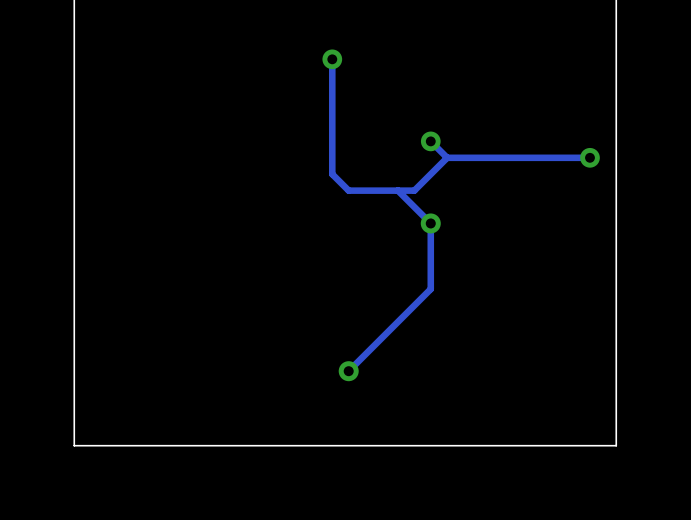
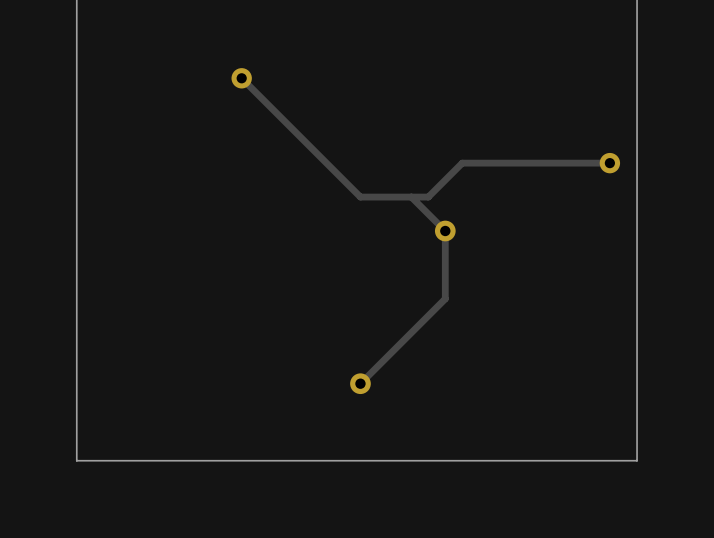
track: (332, 59) (332, 174) -> (241, 78) (343, 180)
via position: (332, 59) -> (241, 78)
track: (430, 141) (447, 157) -> none
via: (430, 141) -> none

